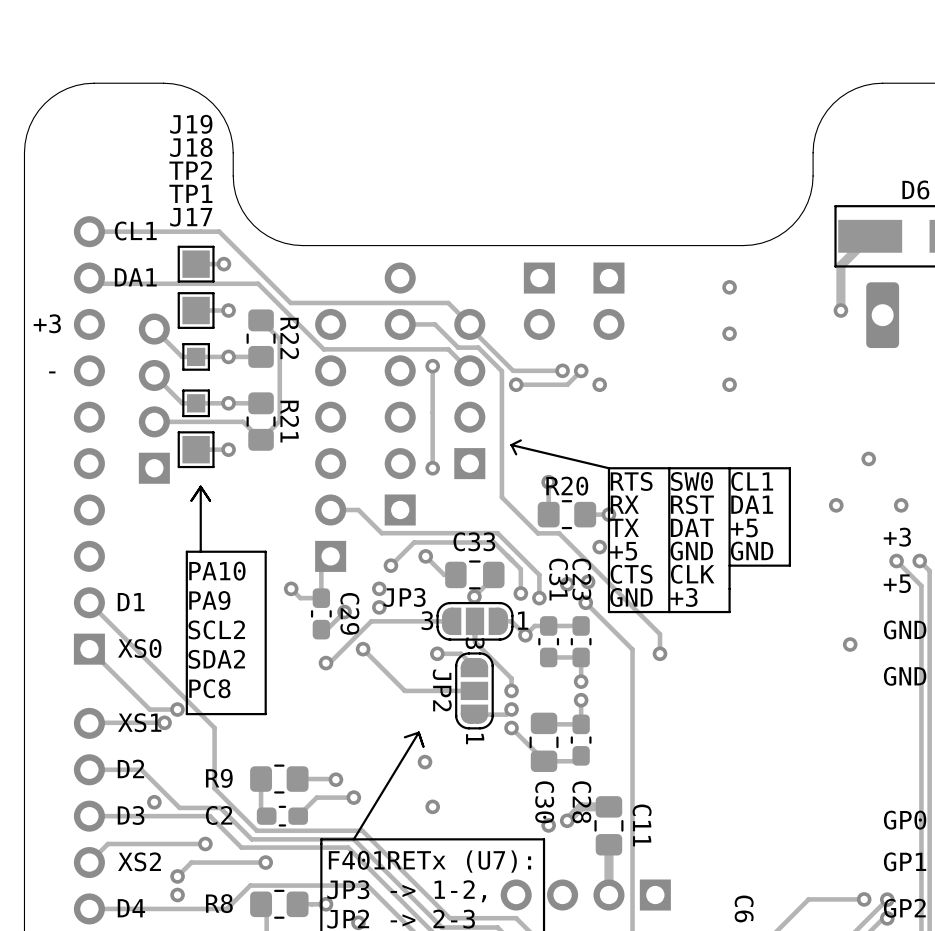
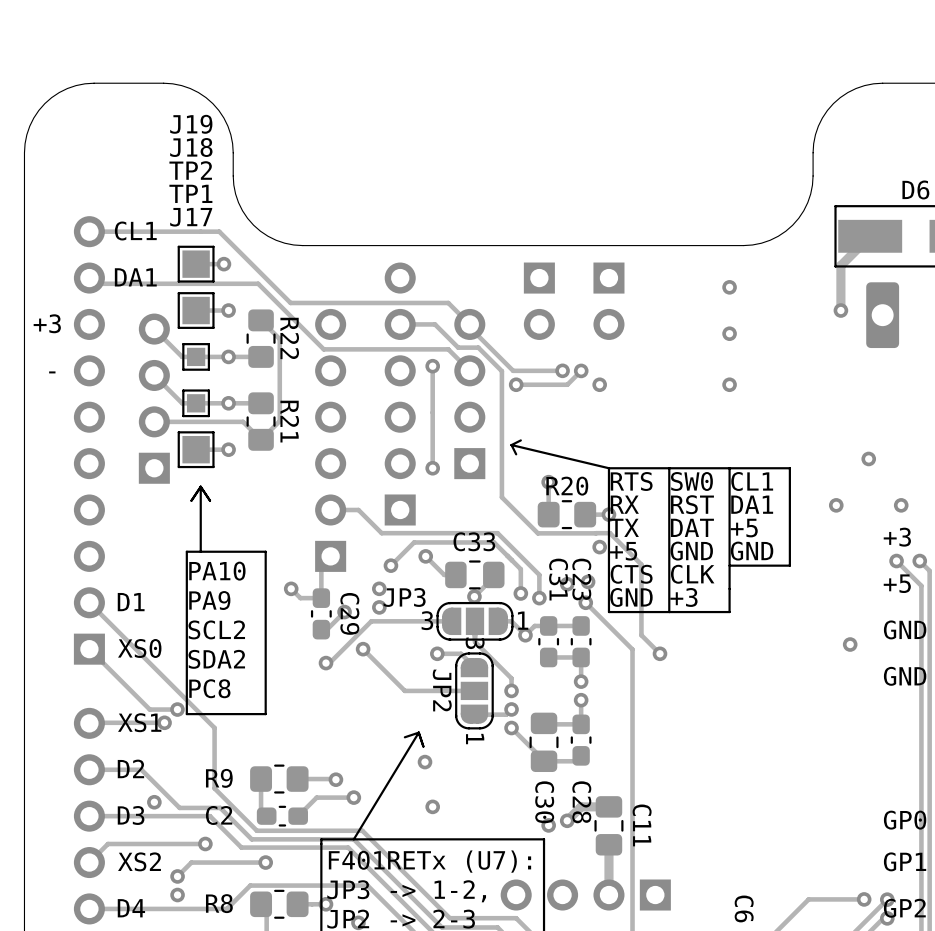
track: (559, 533) (659, 634) (659, 653) -> (596, 533) (610, 533) (641, 564) (641, 635) (659, 653)
track: none -> (595, 533) (559, 533)

